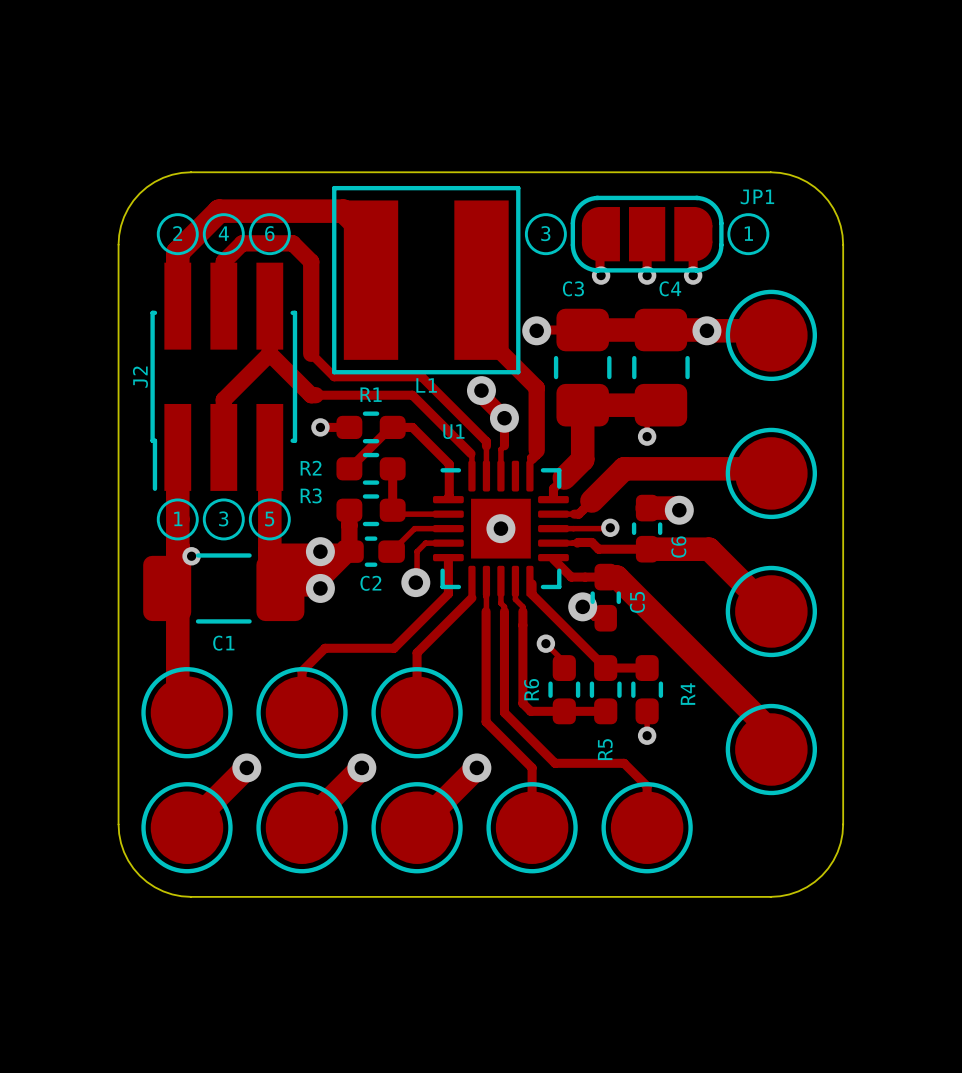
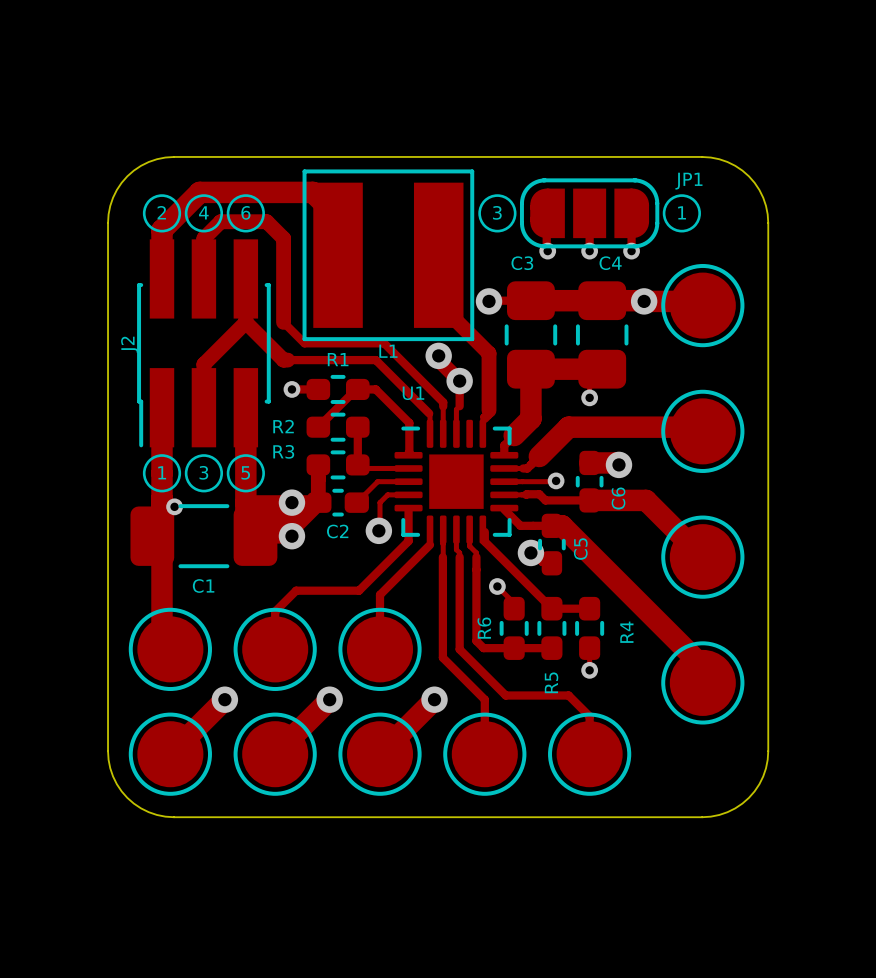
via: (500, 528) -> none

